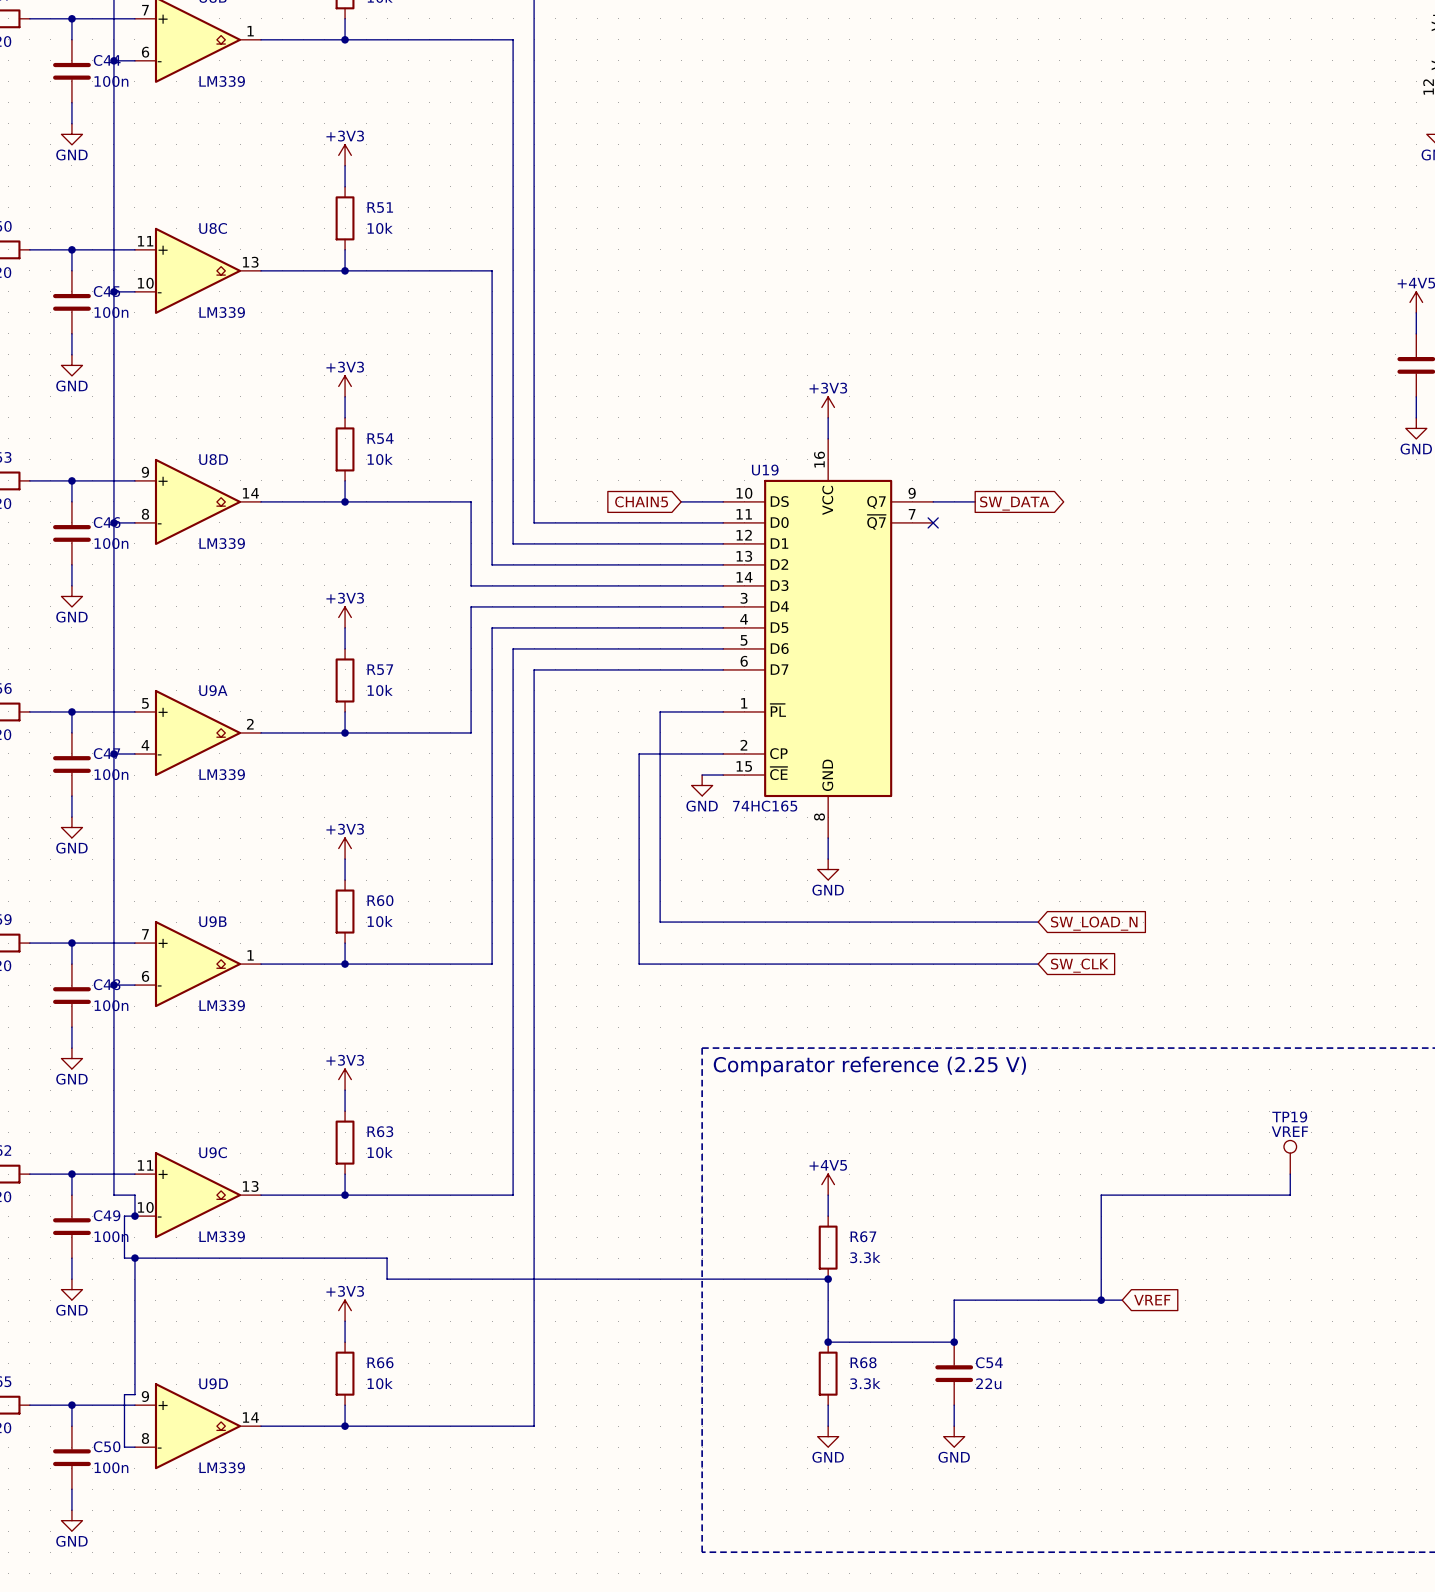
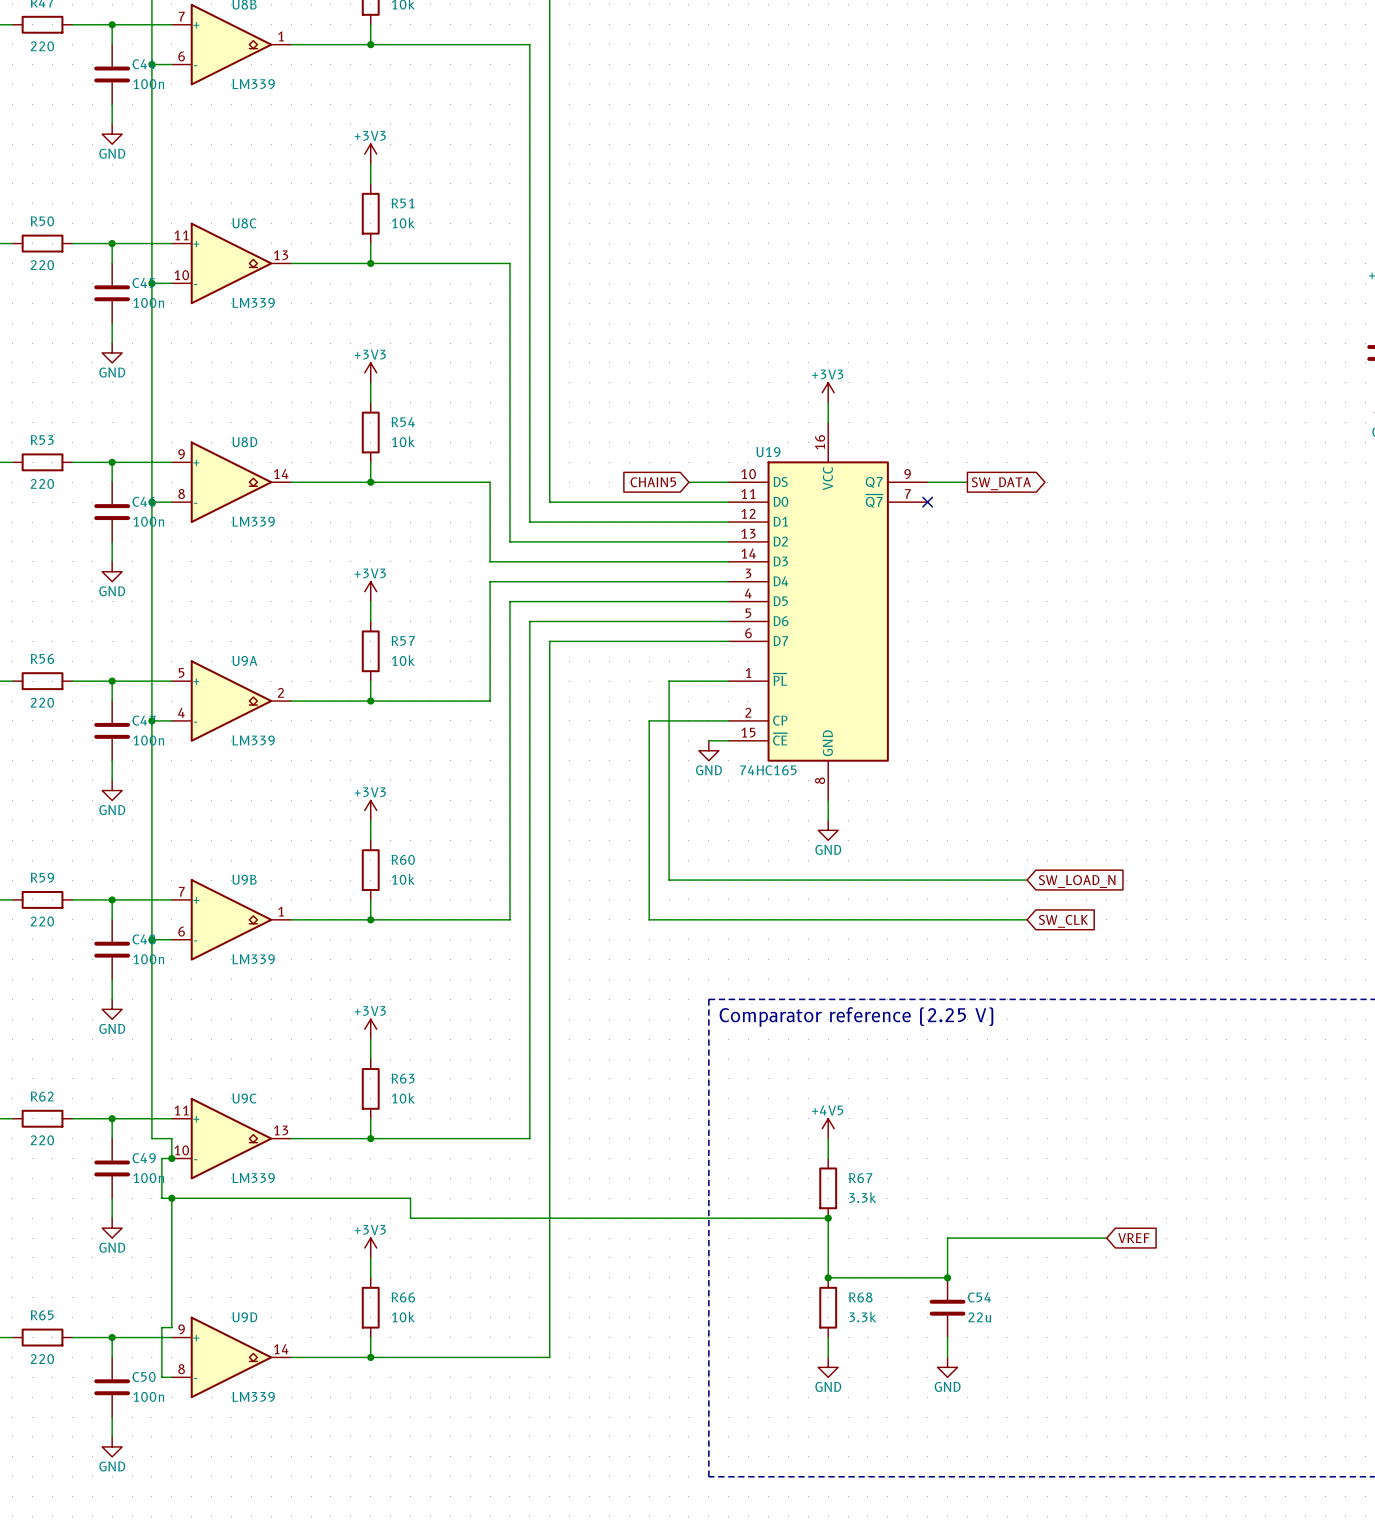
TP19: VREF (1290, 1157) -> none
wire: (1290, 1174) (1290, 1195) (1101, 1195) (1101, 1300) -> none
junction: (1101, 1300) -> none

